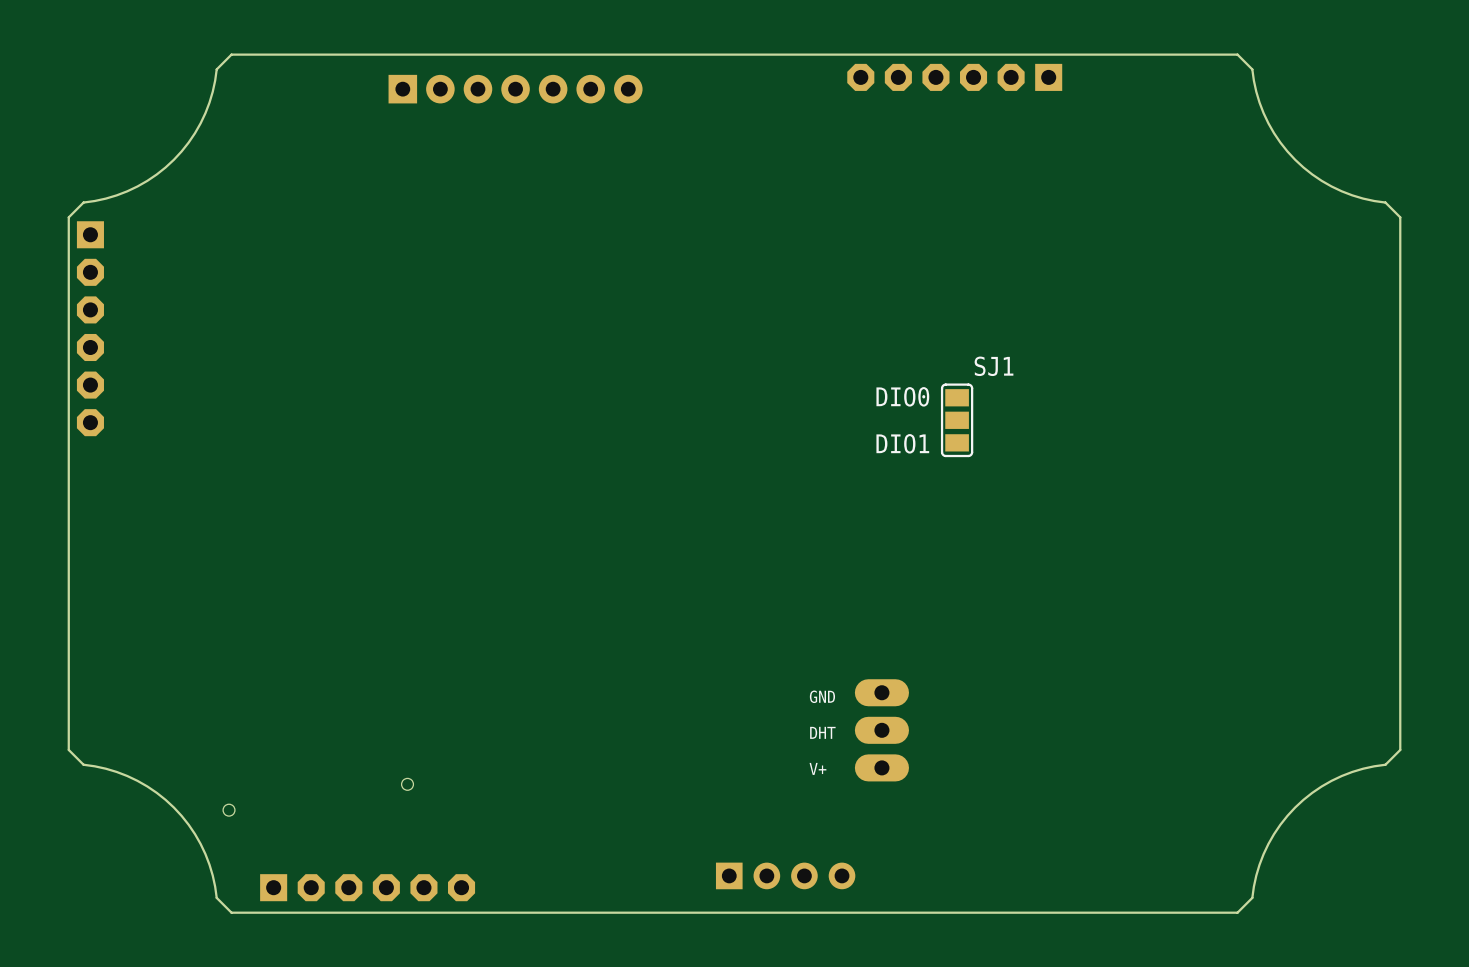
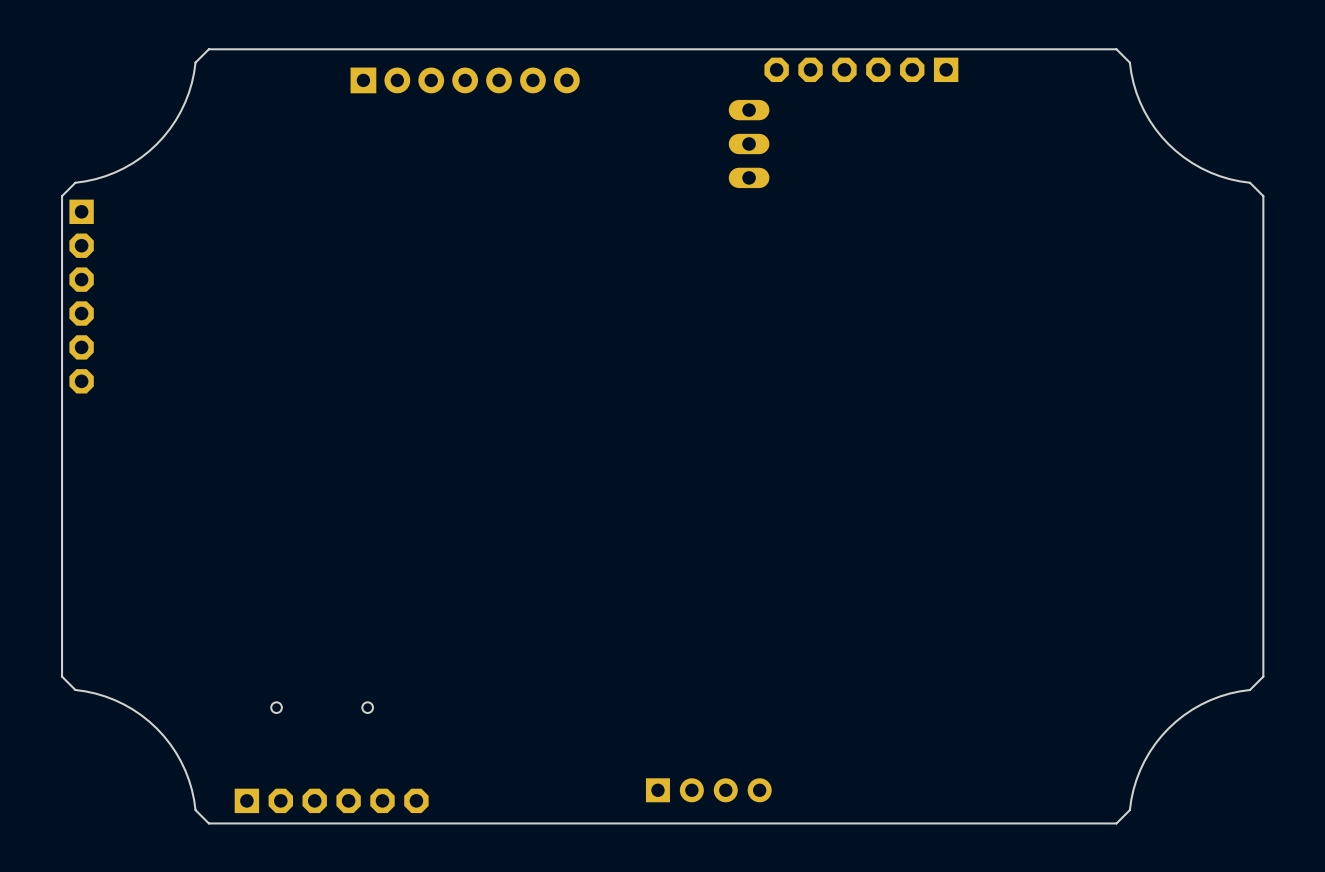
part: none -> (749, 144)
text: DIO0 (902, 396) -> none
SJ1: (957, 420) -> none
text: DIO1 (902, 443) -> none
text: GND (822, 696) -> none
part: (881, 730) -> none
text: DHT (822, 732) -> none
text: V+ (817, 768) -> none
part position: (229, 810) -> (276, 707)

